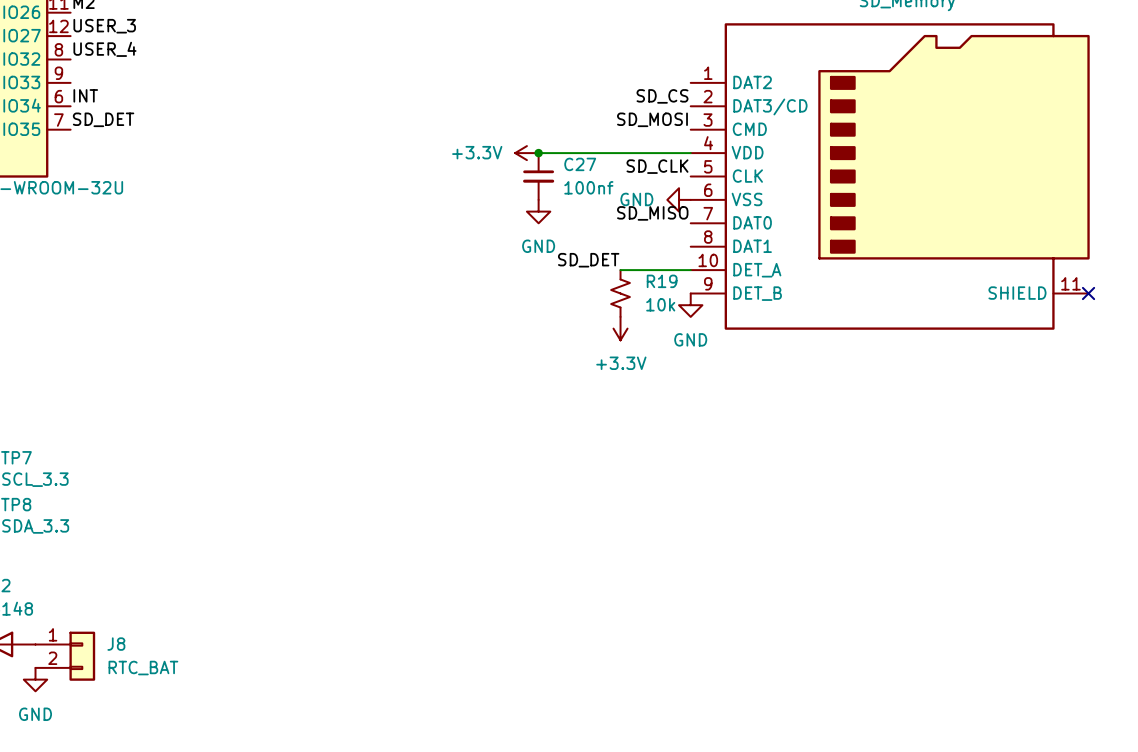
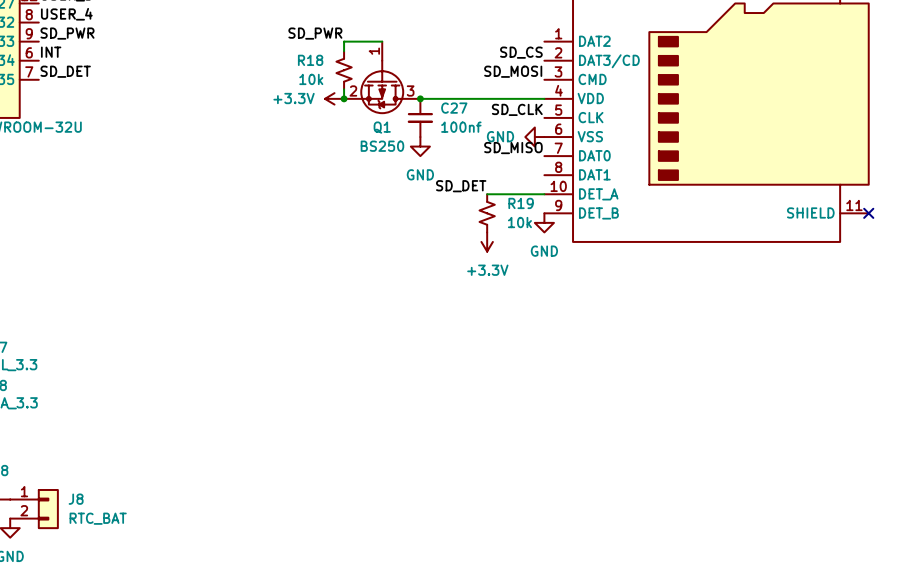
label: none -> SD_PWR (67, 33)
label: none -> SD_PWR (315, 33)
wire: none -> (382, 41) (344, 41) (344, 51)
R18: none -> 10k (344, 70)
Q1: none -> BS250 (382, 77)
wire: none -> (344, 89) (344, 98)
junction: none -> (344, 98)
power symbol position: +3.3V (526, 153) -> +3.3V (334, 98)

